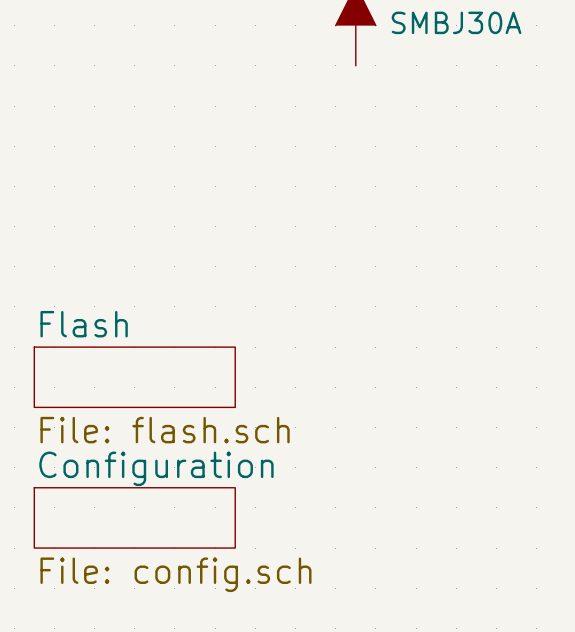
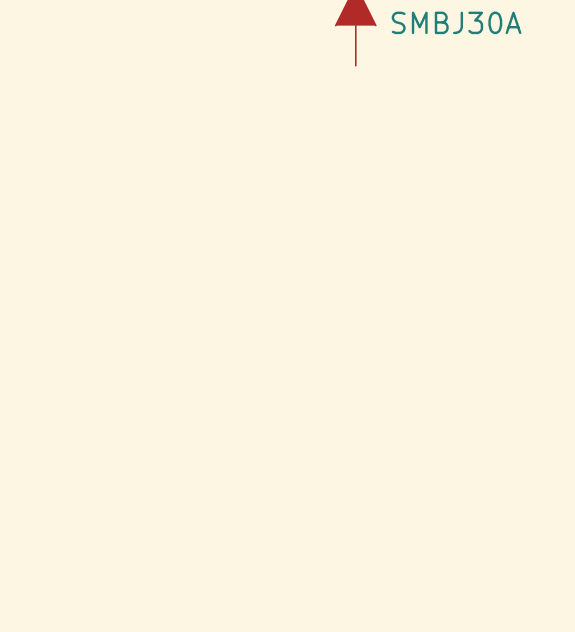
sheet Flash: File: flash.sch (134, 377) -> none
sheet Configuration: File: config.sch (134, 517) -> none

